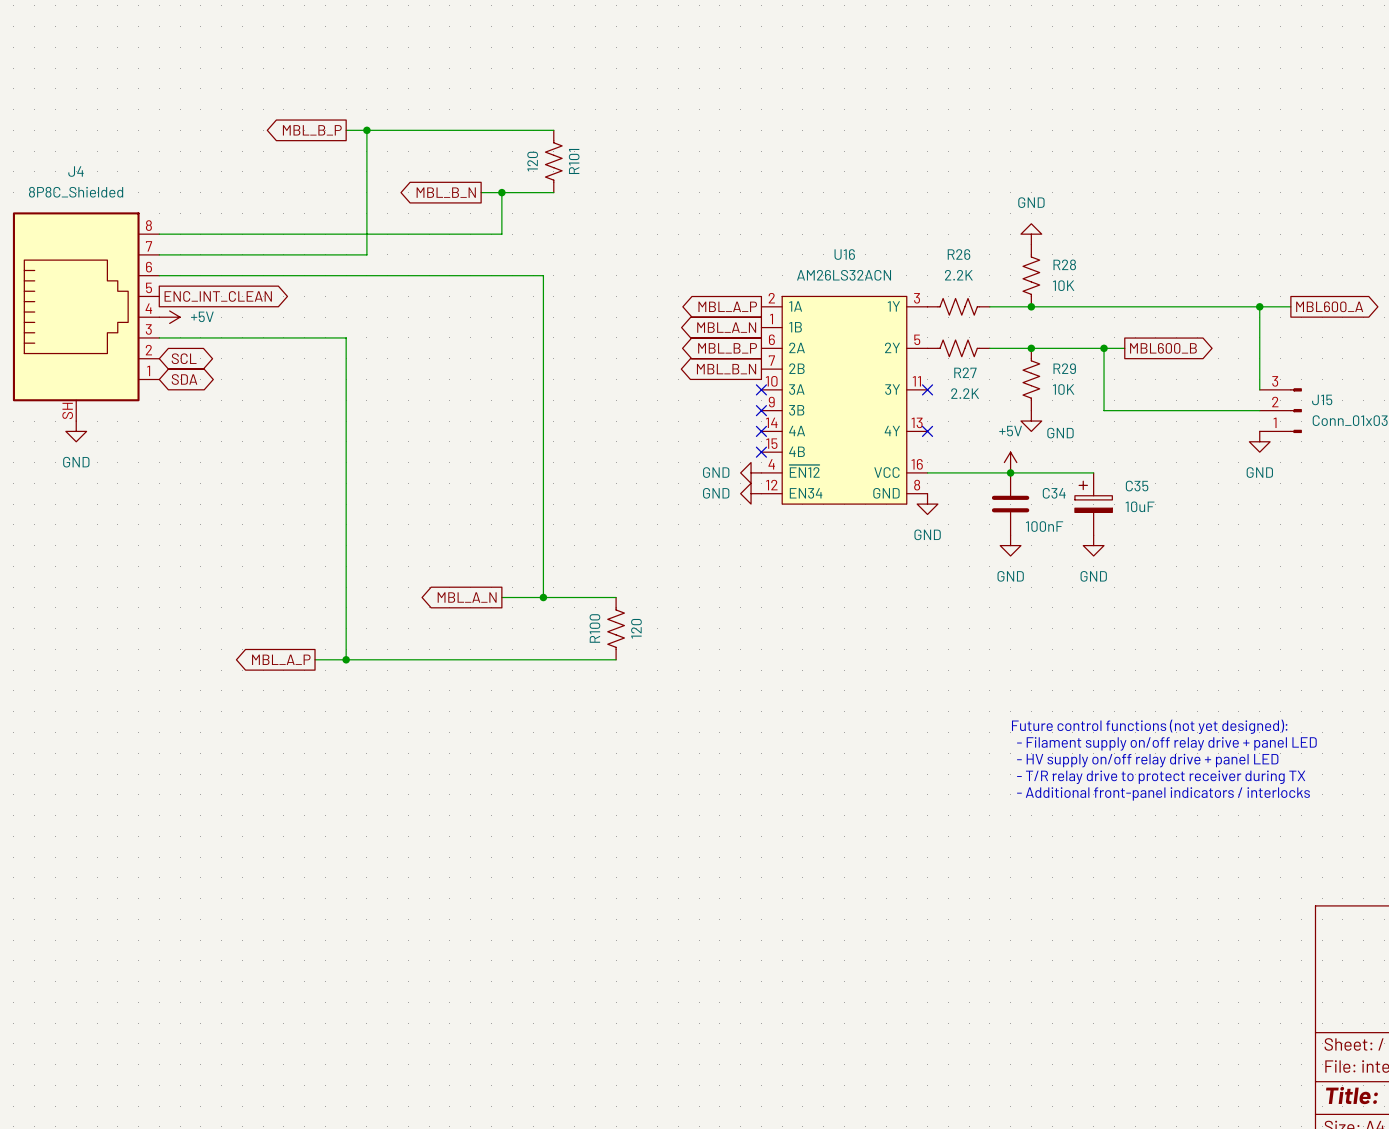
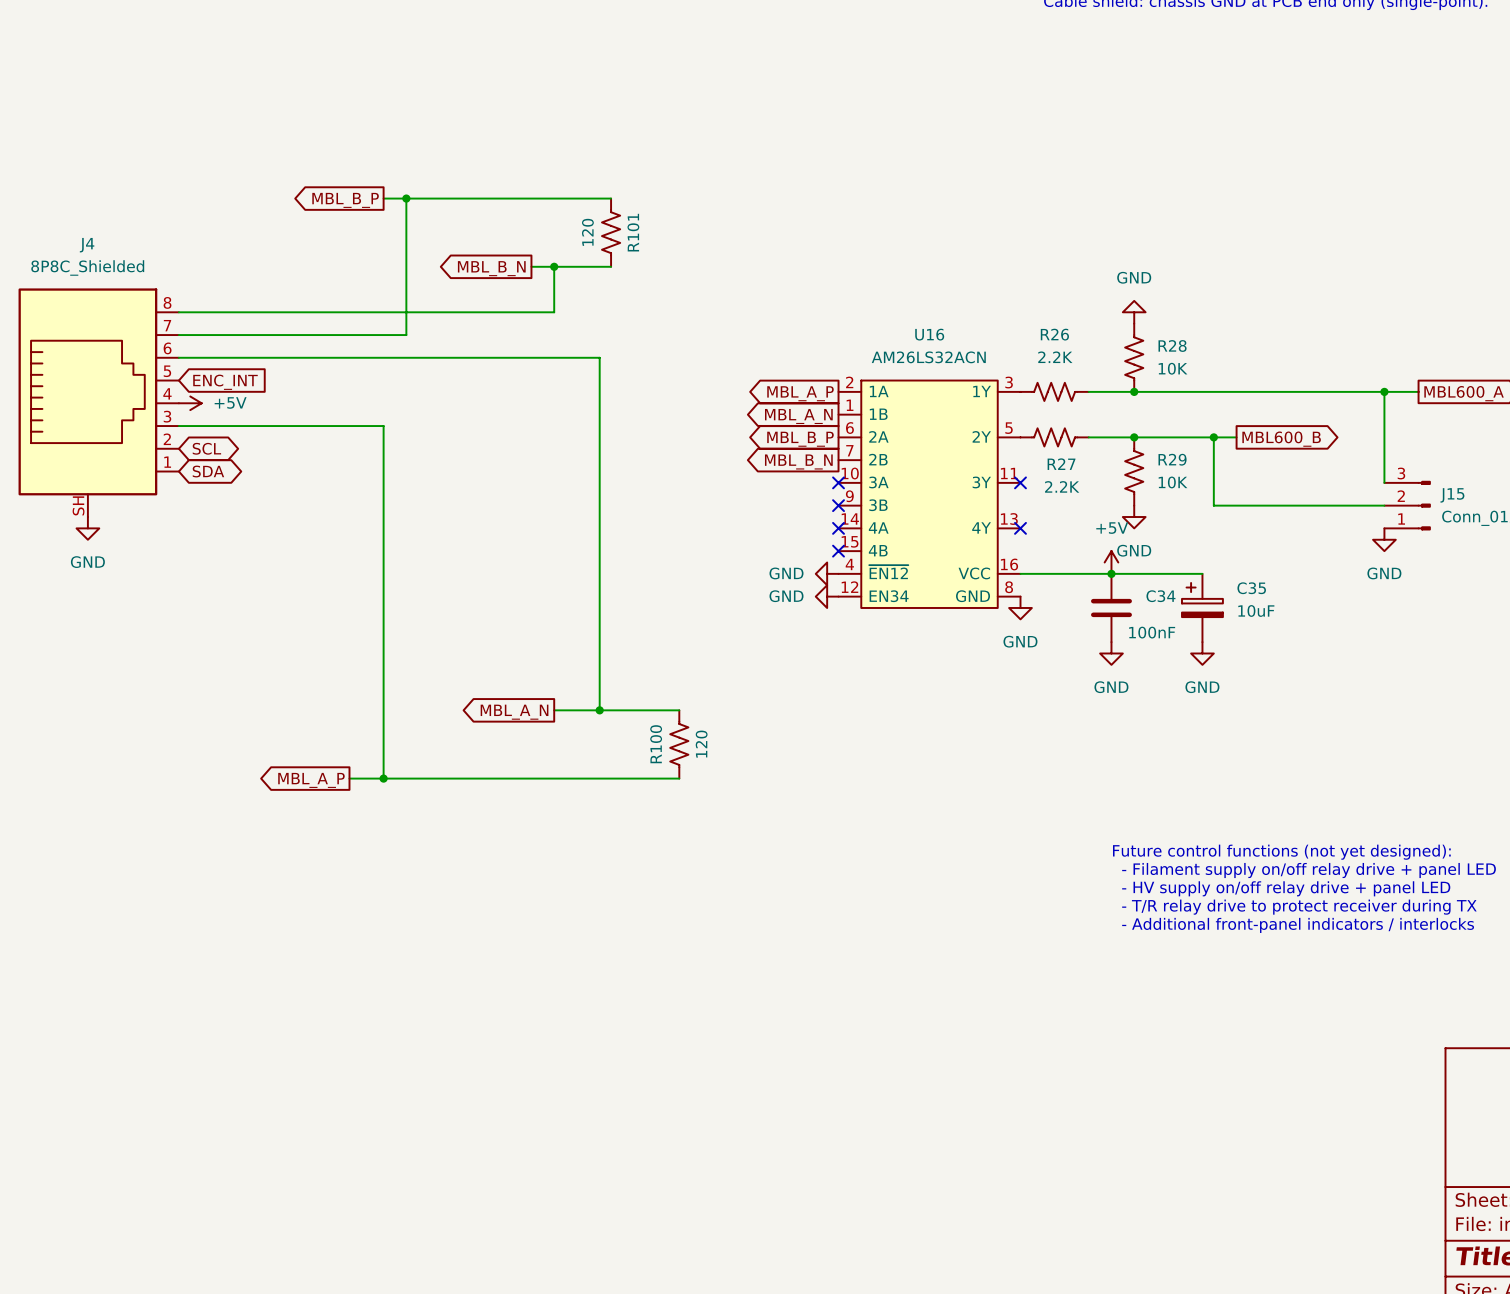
global label shape: output (218, 296) -> input (225, 382)
global label: ENC_INT_CLEAN (218, 296) -> ENC_INT (225, 382)
power symbol text position: GND (1060, 433) -> GND (1134, 550)

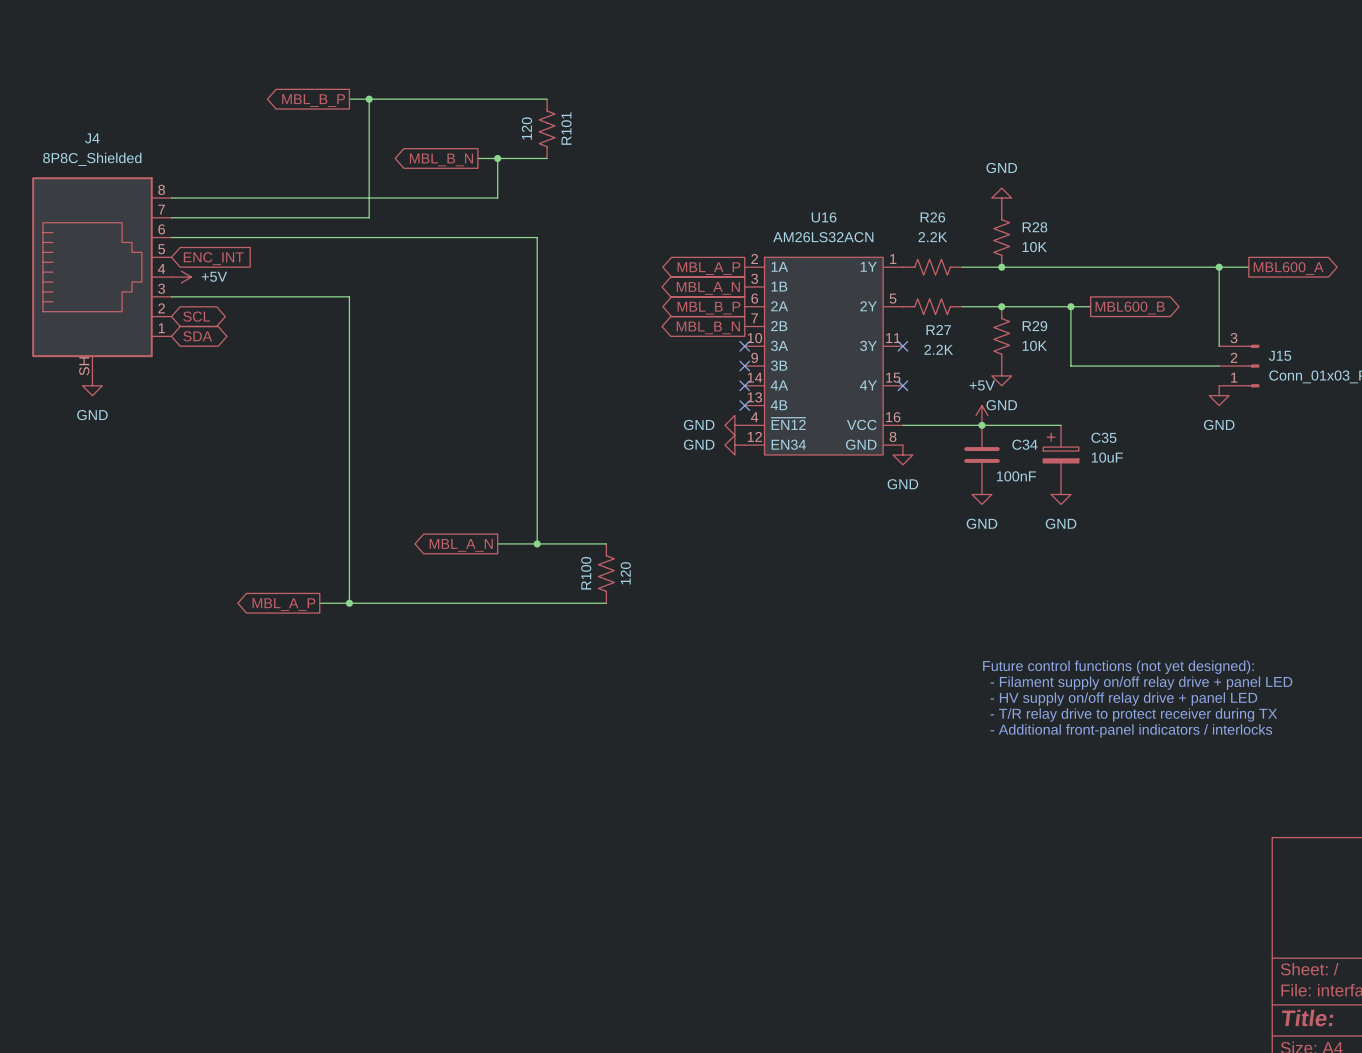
U16 pin number: 3 (1009, 382) -> 1 (893, 259)
U16 pin number: 1 (850, 405) -> 3 (754, 278)
U16 pin number: 13 (1009, 519) -> 15 (893, 377)
U16 pin number: 15 (850, 541) -> 13 (754, 397)

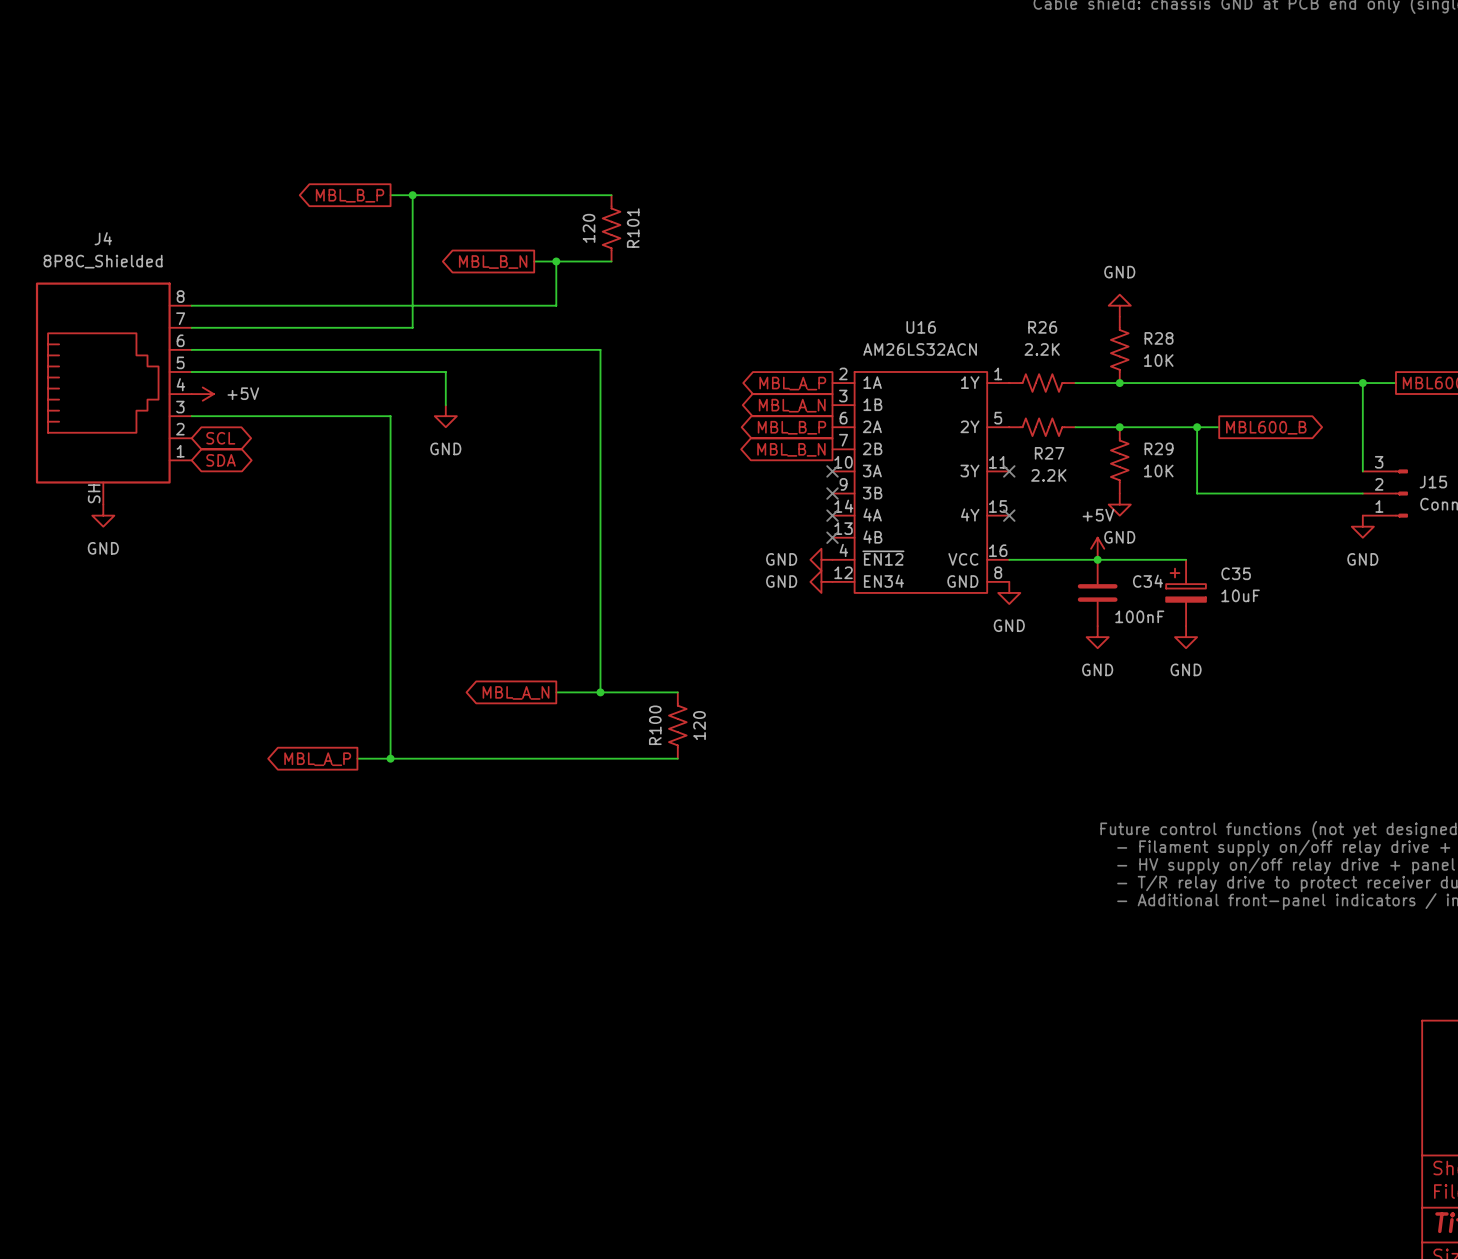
wire: none -> (191, 371) (445, 371) (445, 405)
global label: ENC_INT (213, 258) -> none
power symbol: none -> GND (445, 416)

